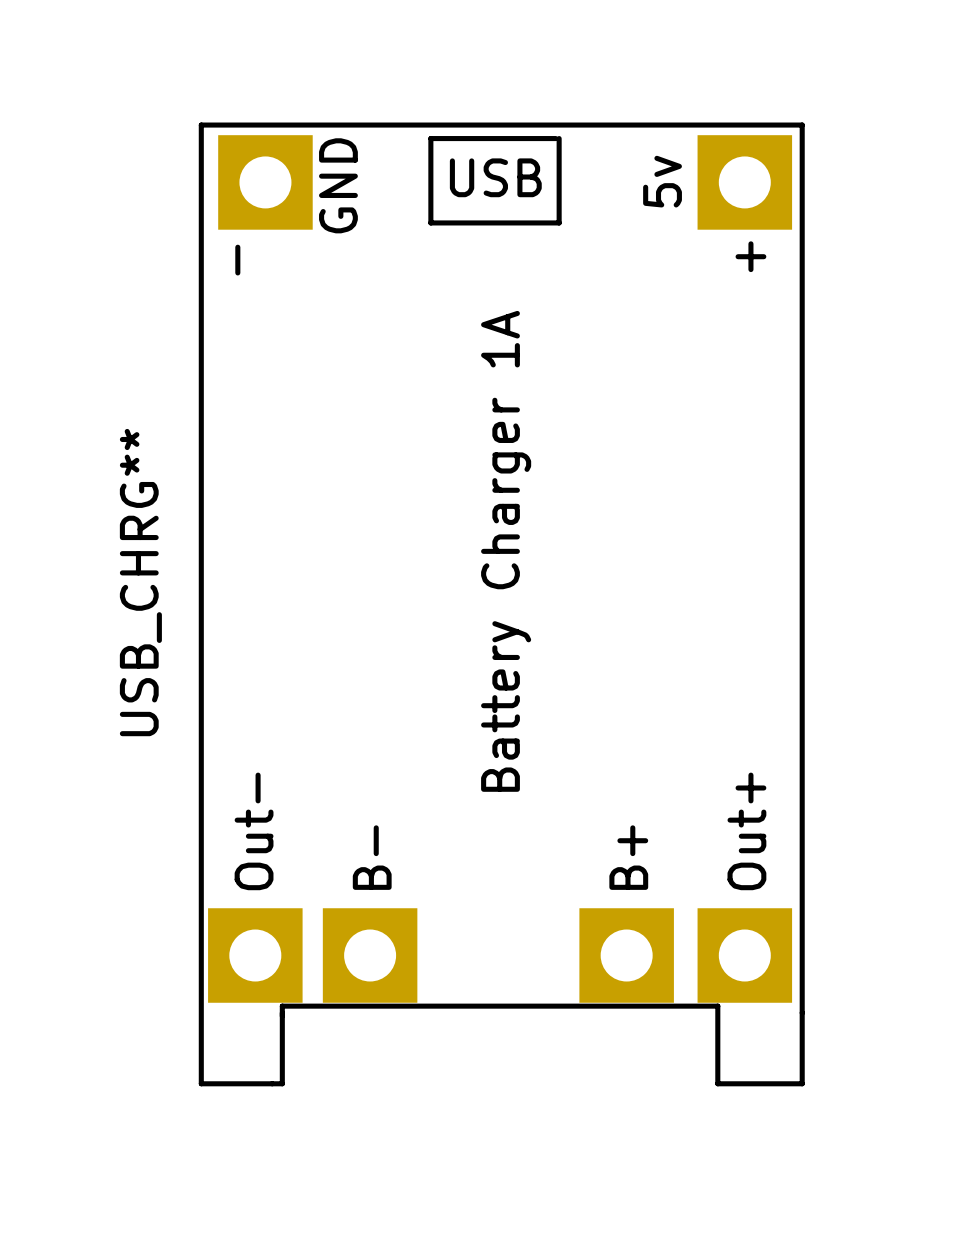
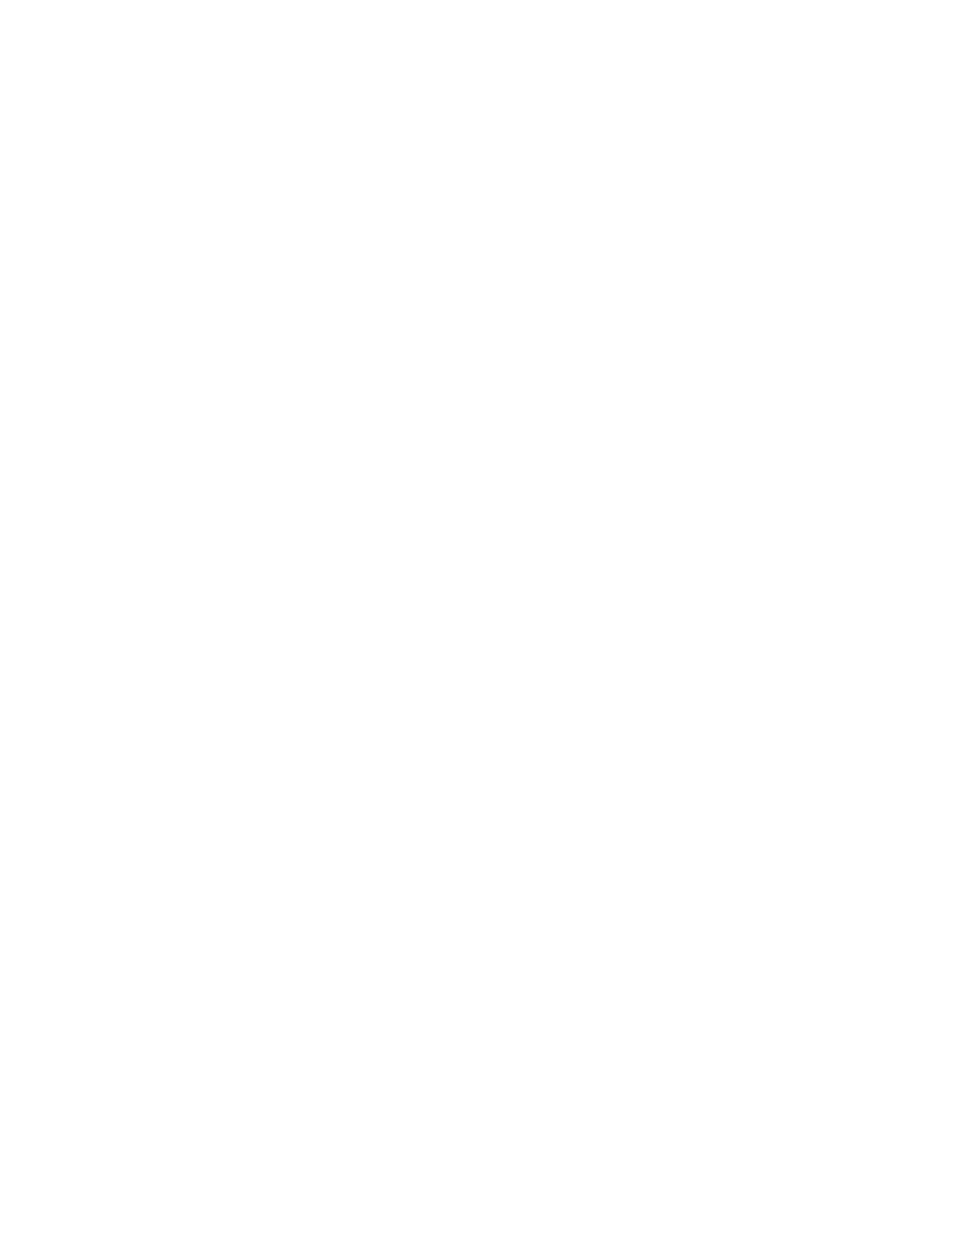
USB_CHRG**: (501, 604) -> none

